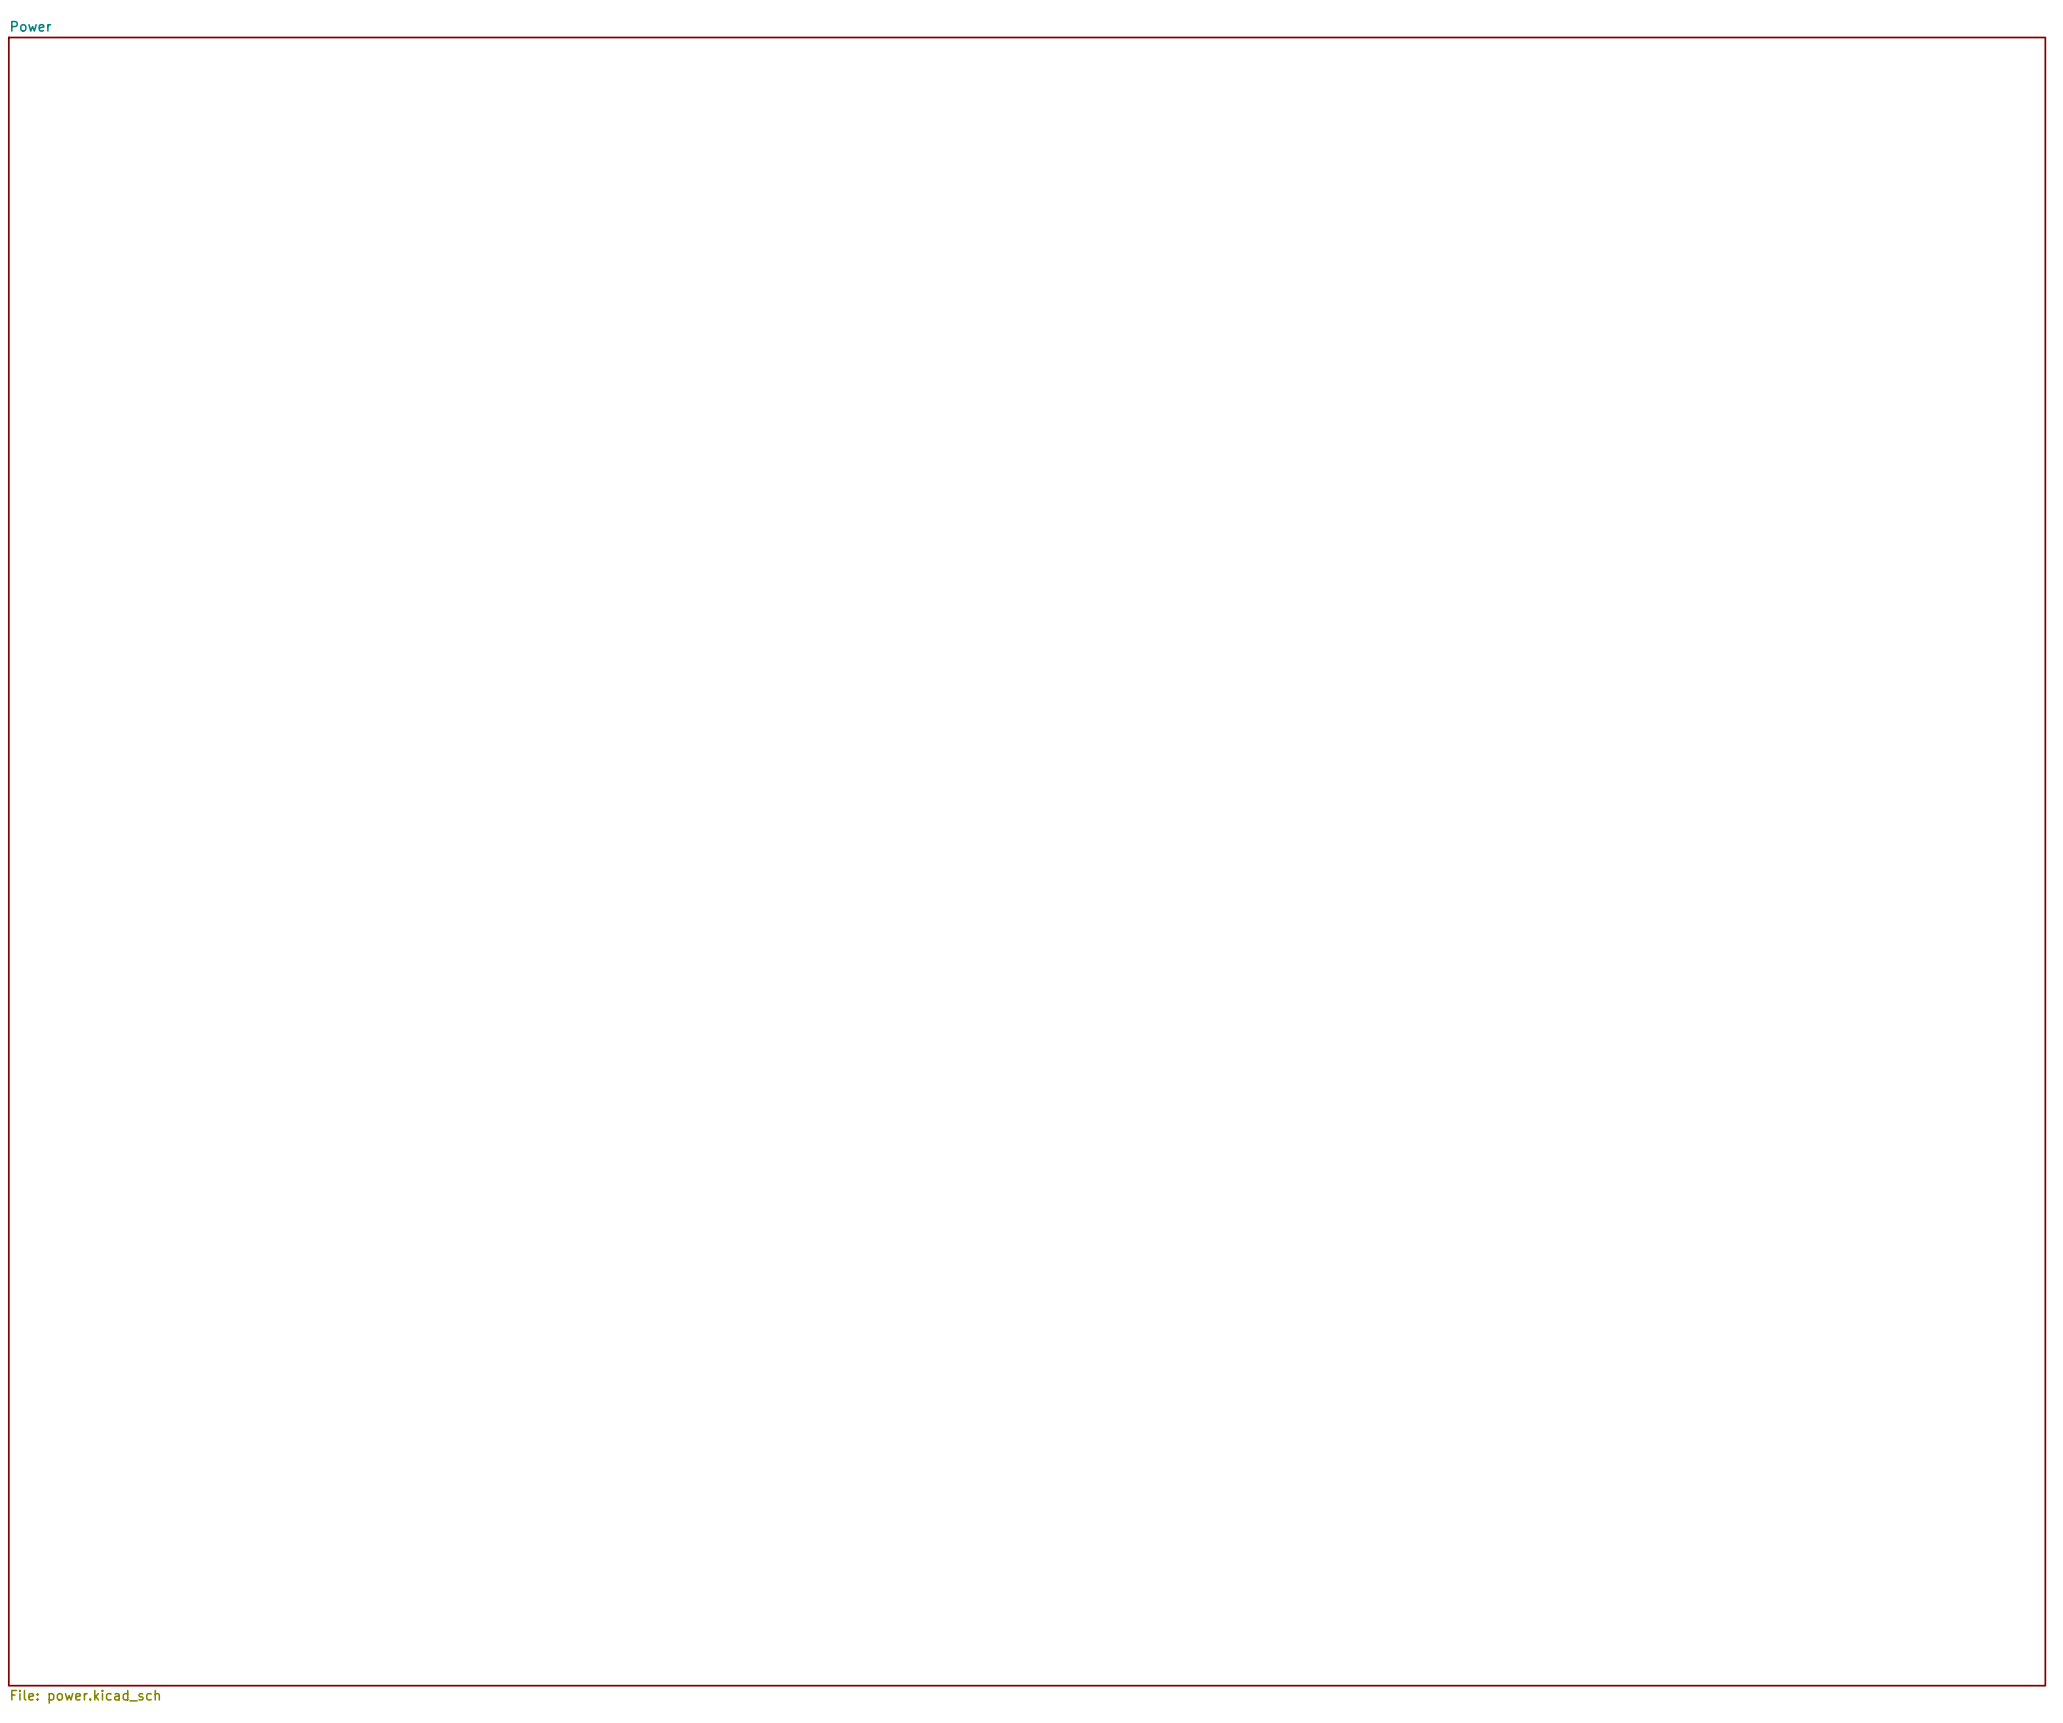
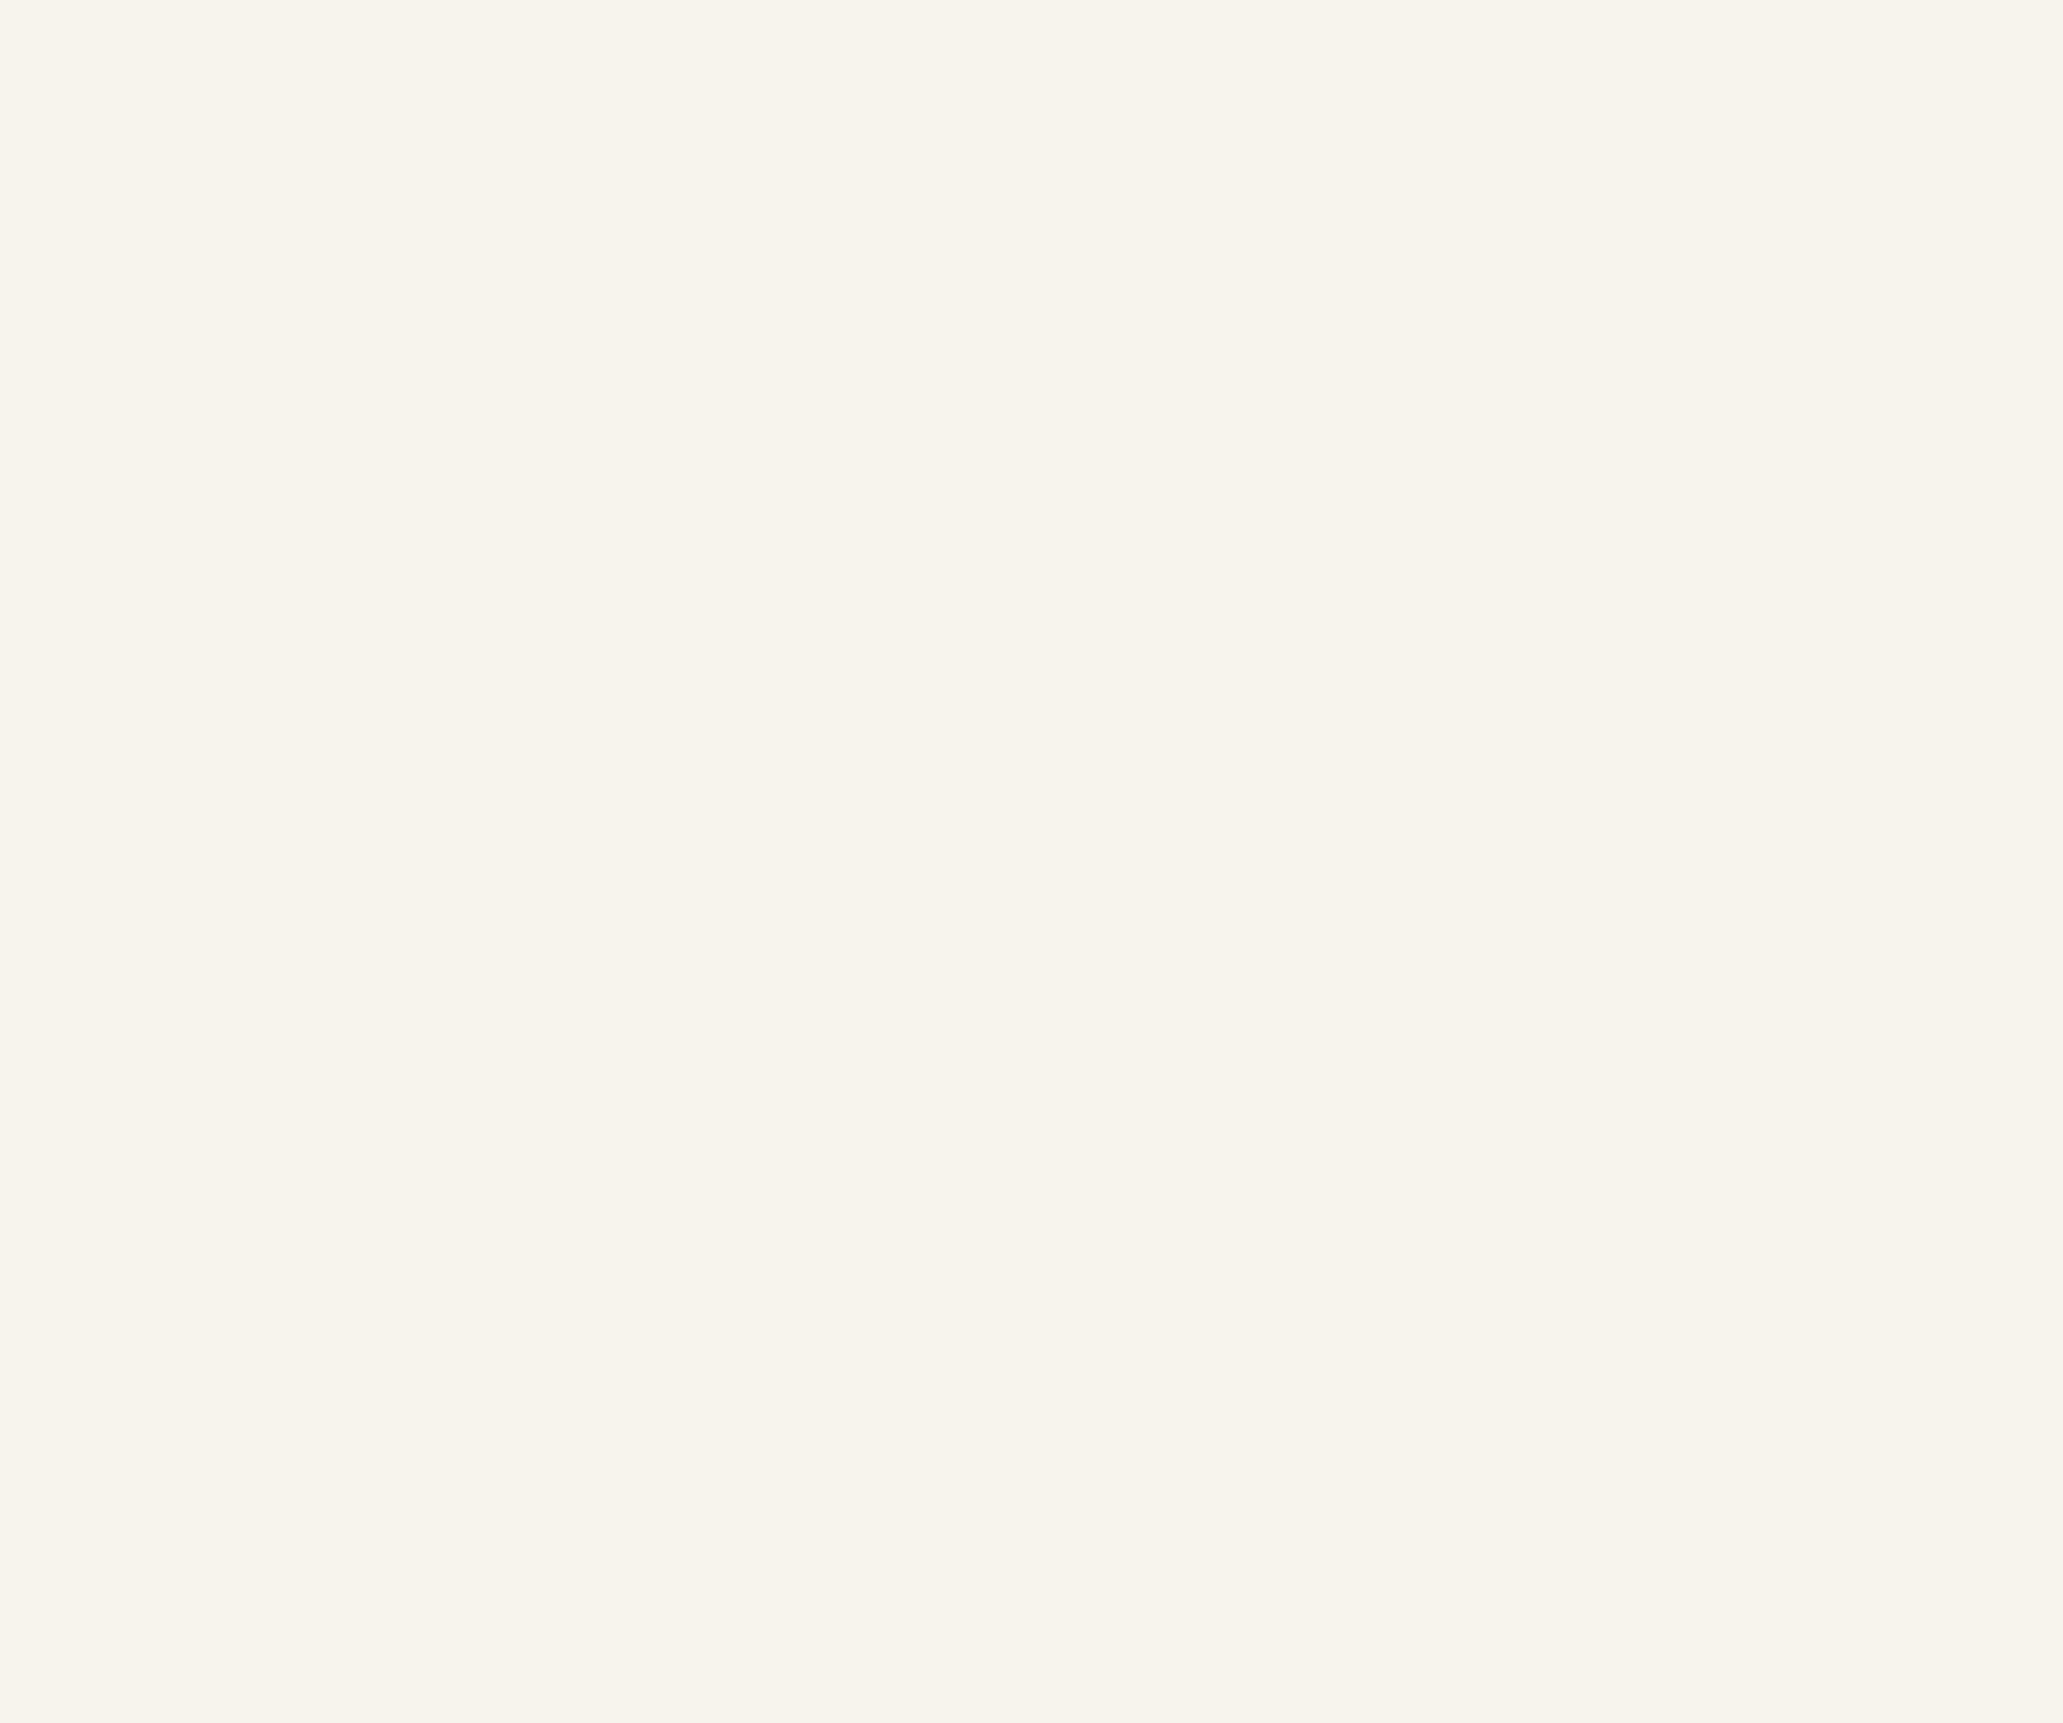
sheet Power: File: power.kicad_sch (1027, 861) -> none

